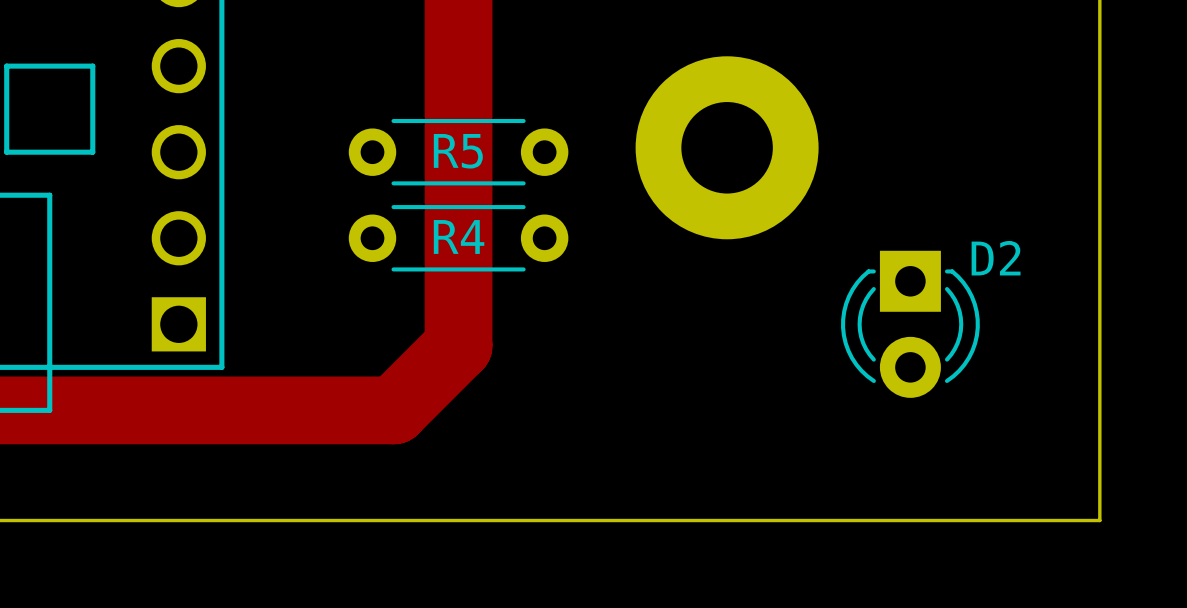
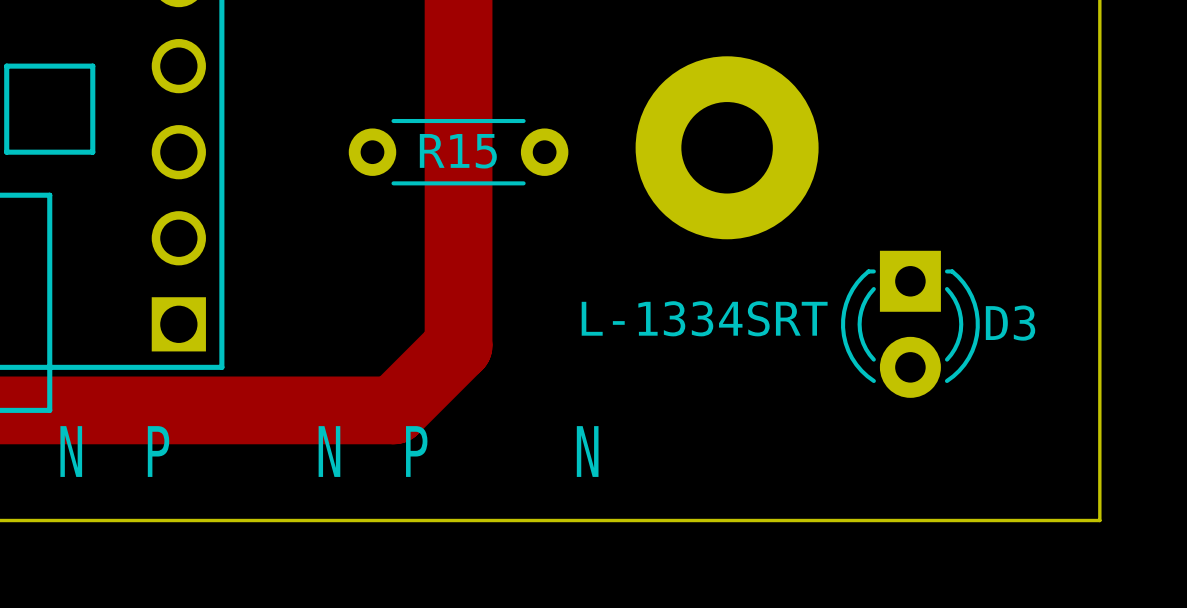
R5 name: R5 (458, 151) -> R15 (458, 151)
R4: (458, 238) -> none
D2 name: D2 (996, 258) -> D3 (1010, 323)
D2 value: none -> L-1334SRT (704, 318)
text: none -> N (71, 451)
text: none -> P (158, 451)
text: none -> N (329, 451)
text: none -> P (416, 451)
text: none -> N (587, 451)

